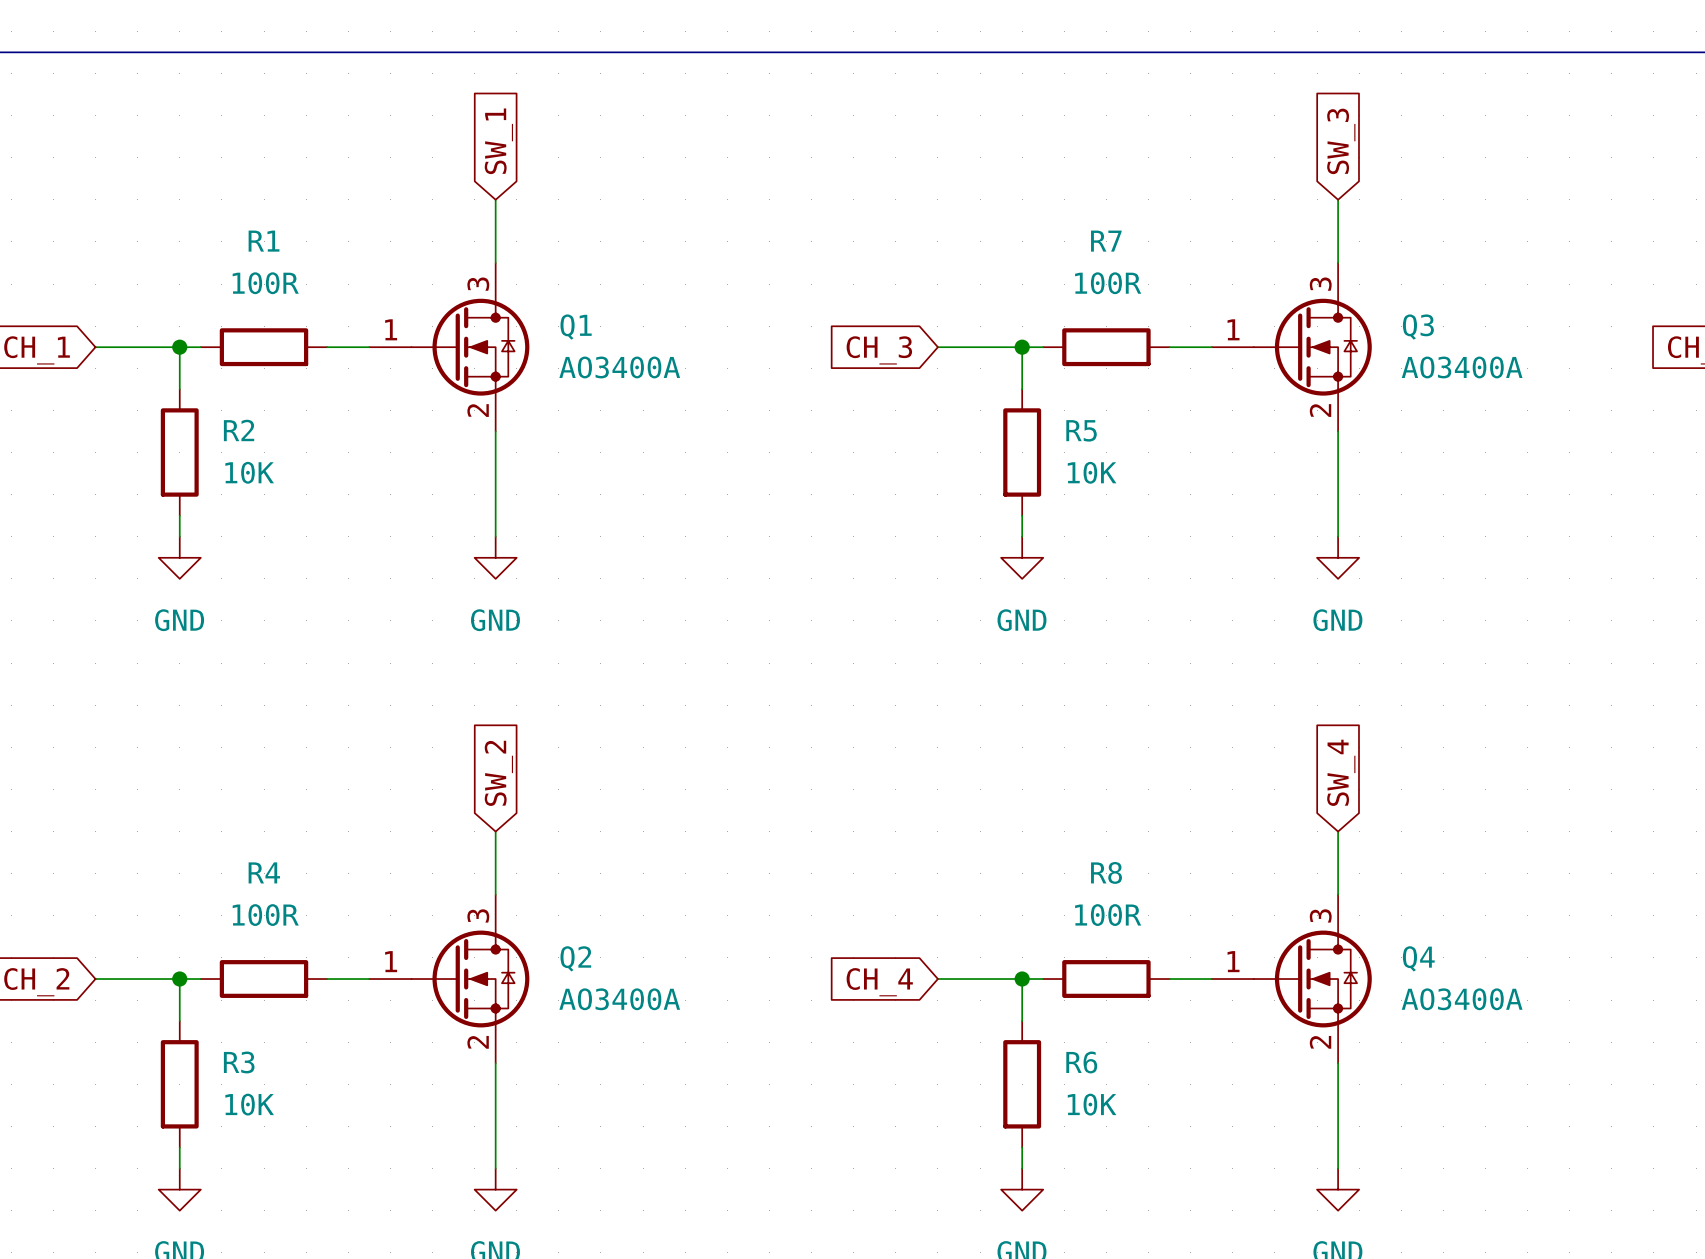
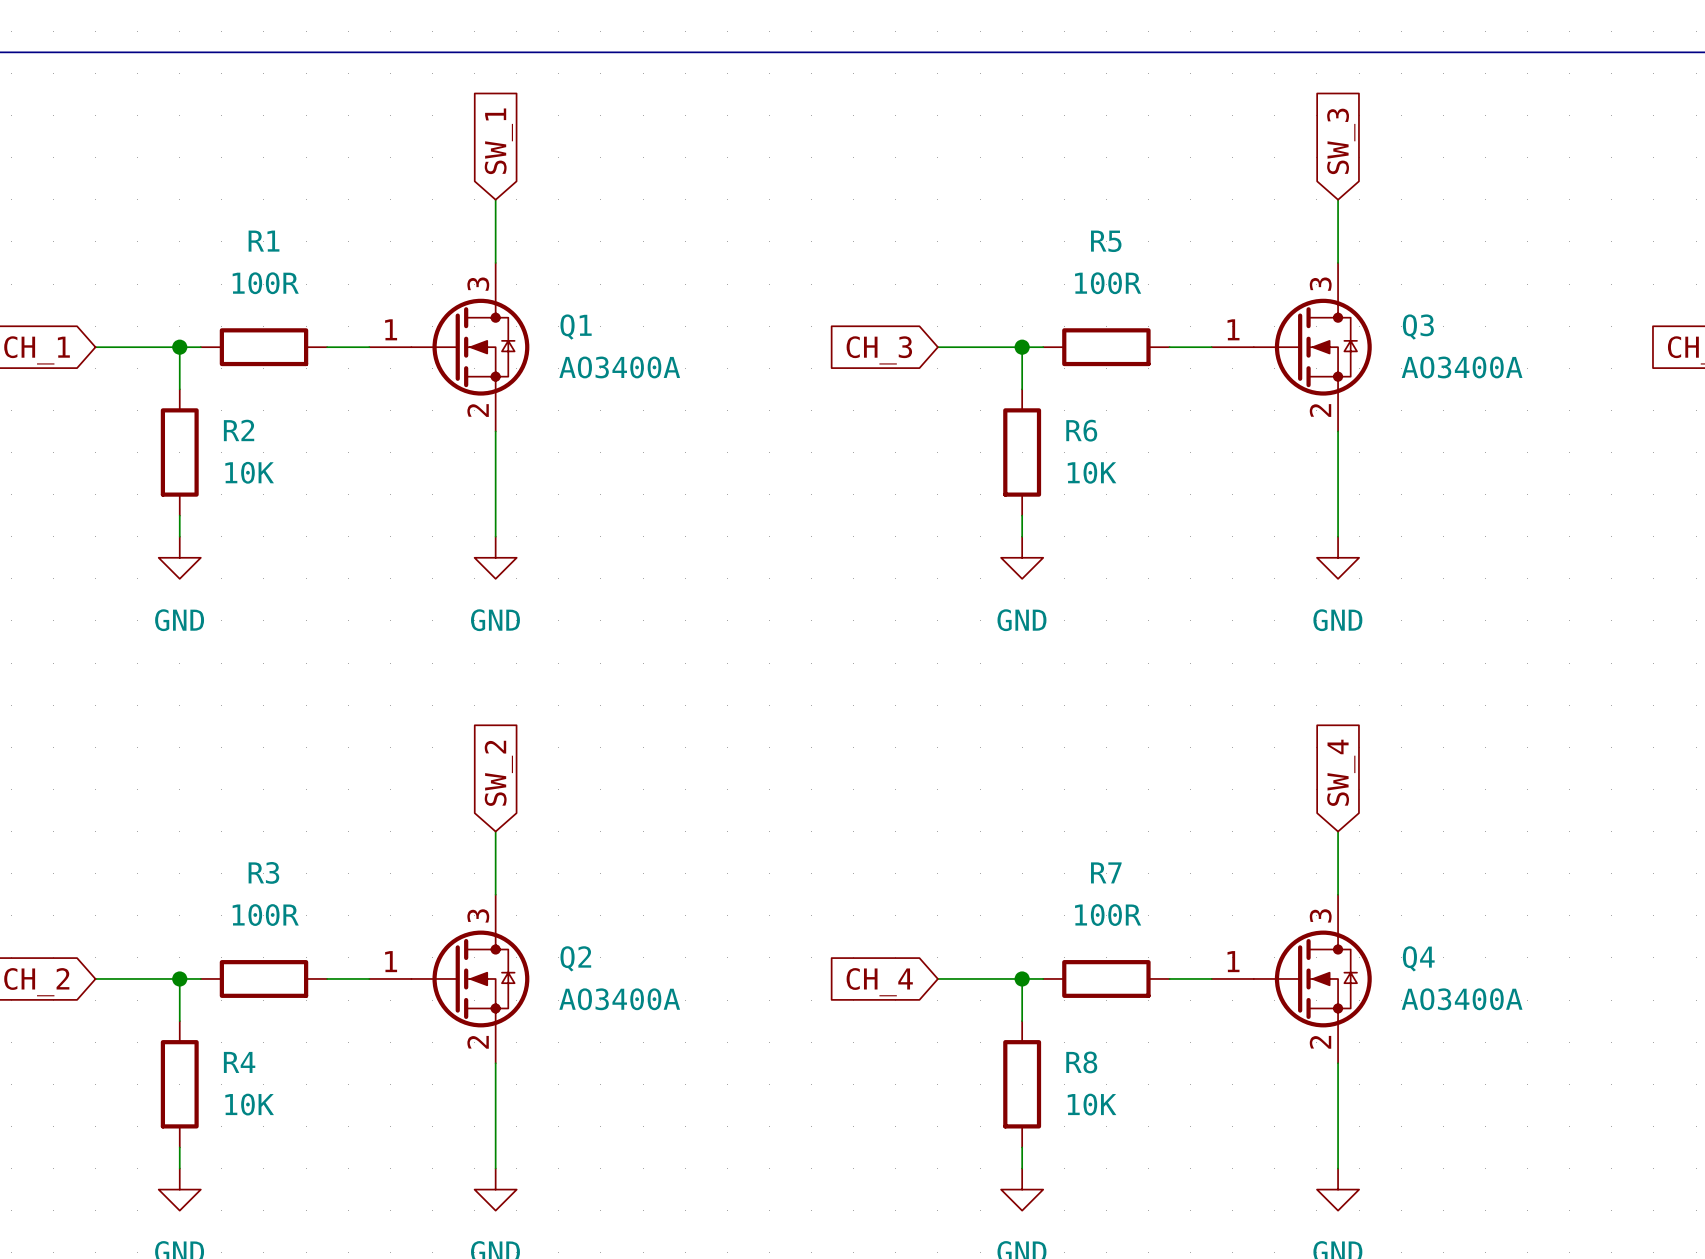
R7 name: R7 (1106, 241) -> R5 (1106, 241)
R5 name: R5 (1081, 430) -> R6 (1081, 430)
R4 name: R4 (264, 872) -> R3 (263, 872)
R8 name: R8 (1106, 872) -> R7 (1106, 872)
R3 name: R3 (239, 1062) -> R4 (239, 1062)
R6 name: R6 (1081, 1062) -> R8 (1081, 1062)

